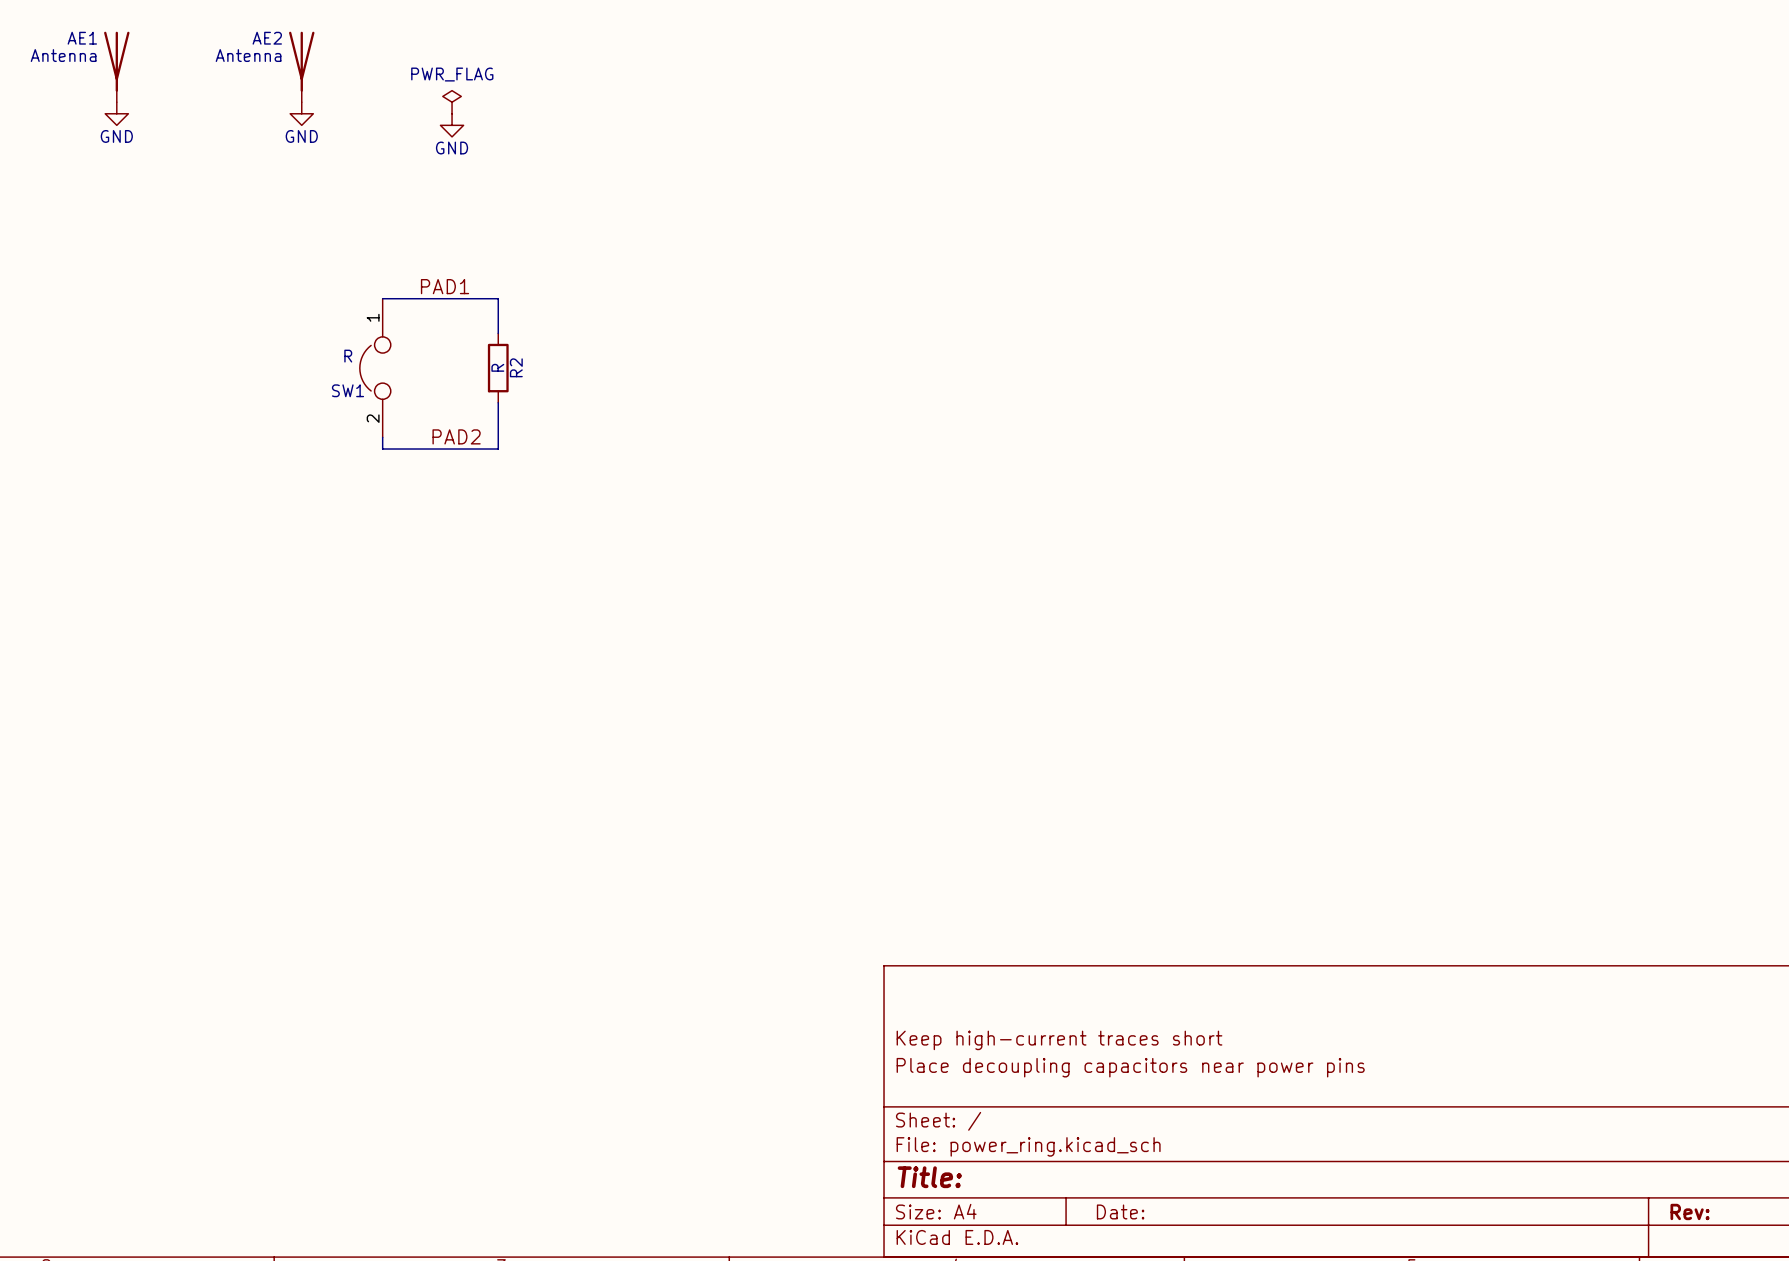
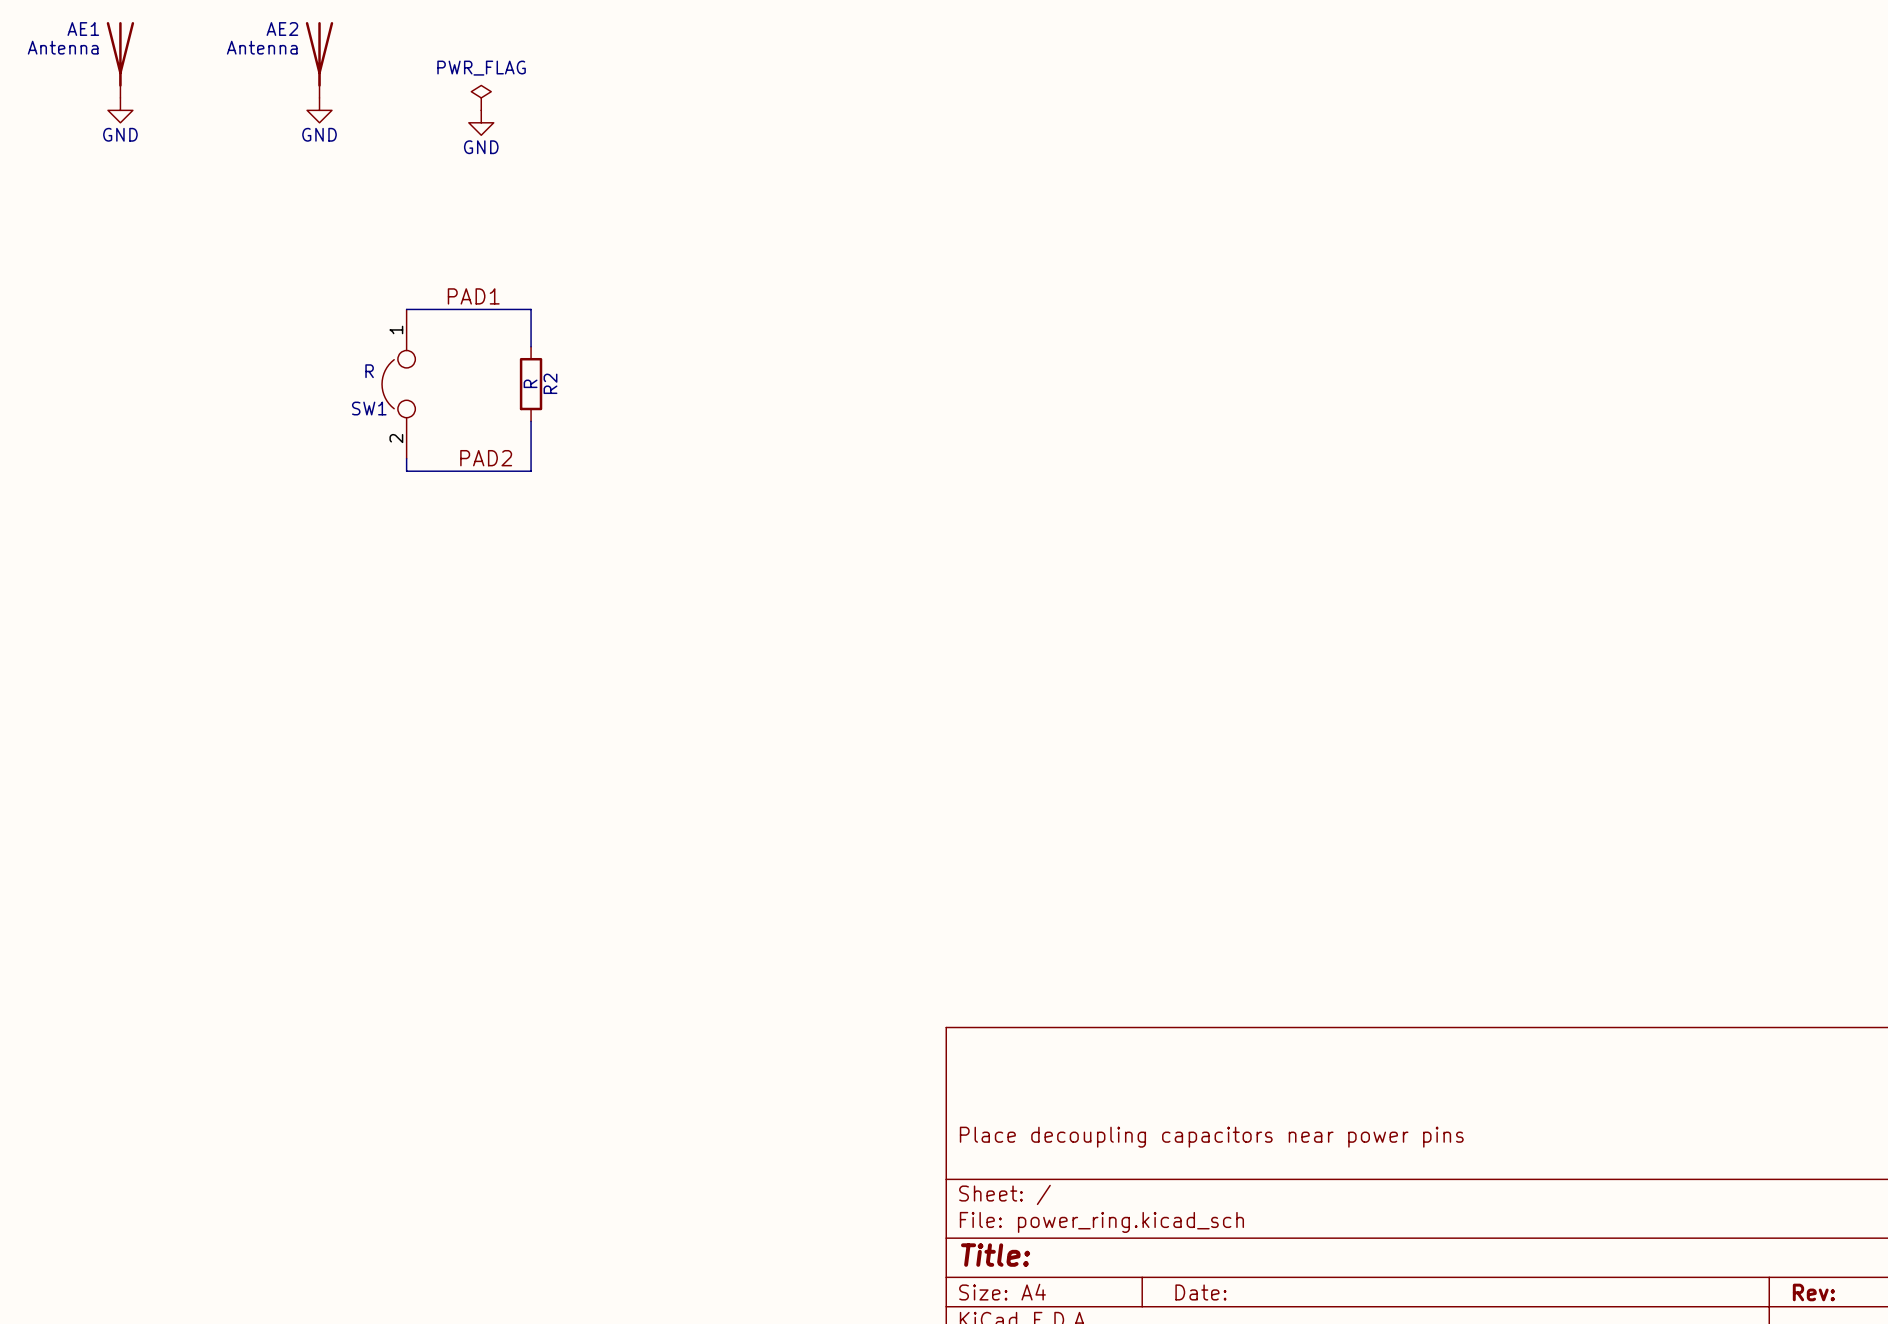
title block: Keep high-current traces short (1059, 1040) -> none

